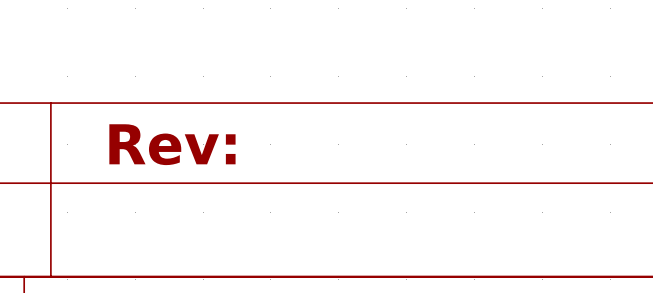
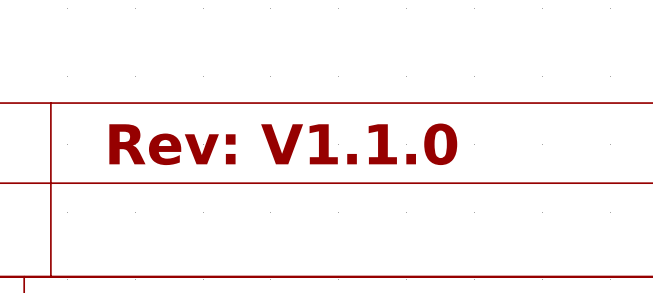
title block: Rev: (172, 144) -> Rev: V1.1.0 (283, 144)

